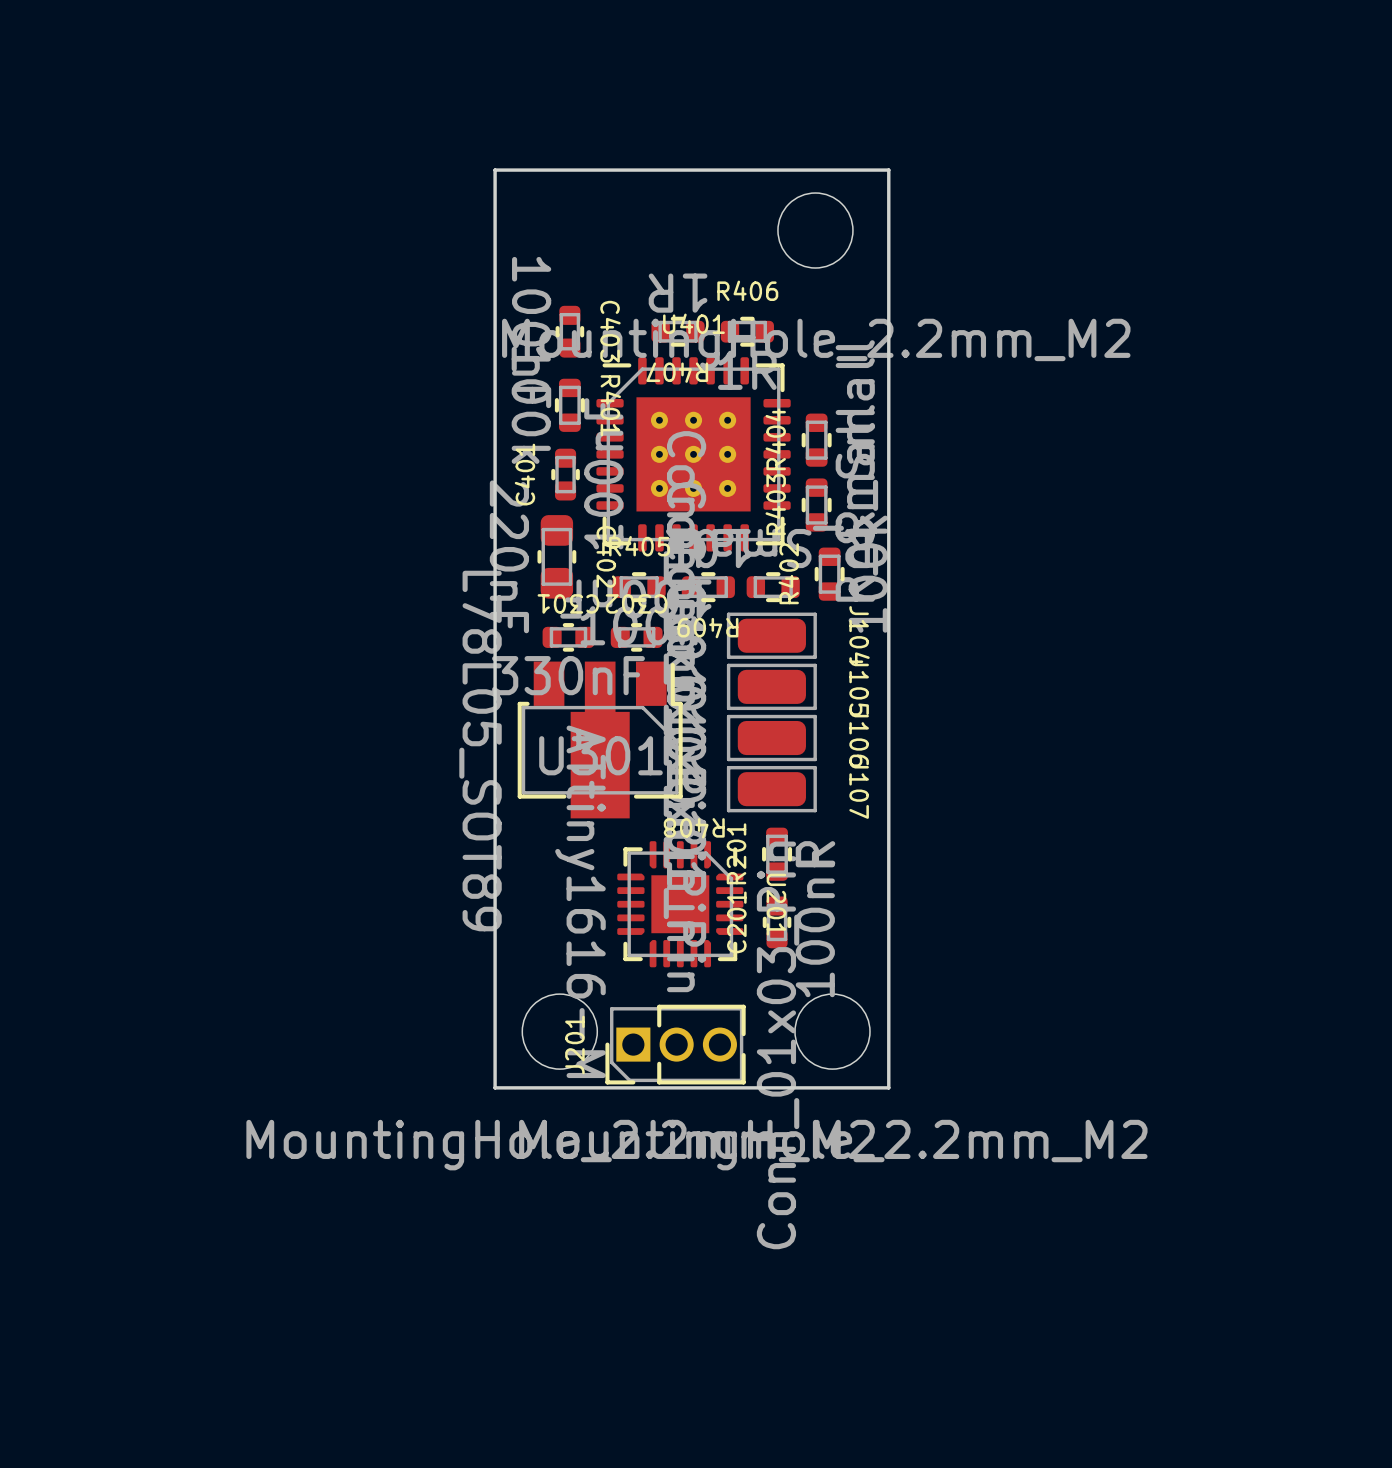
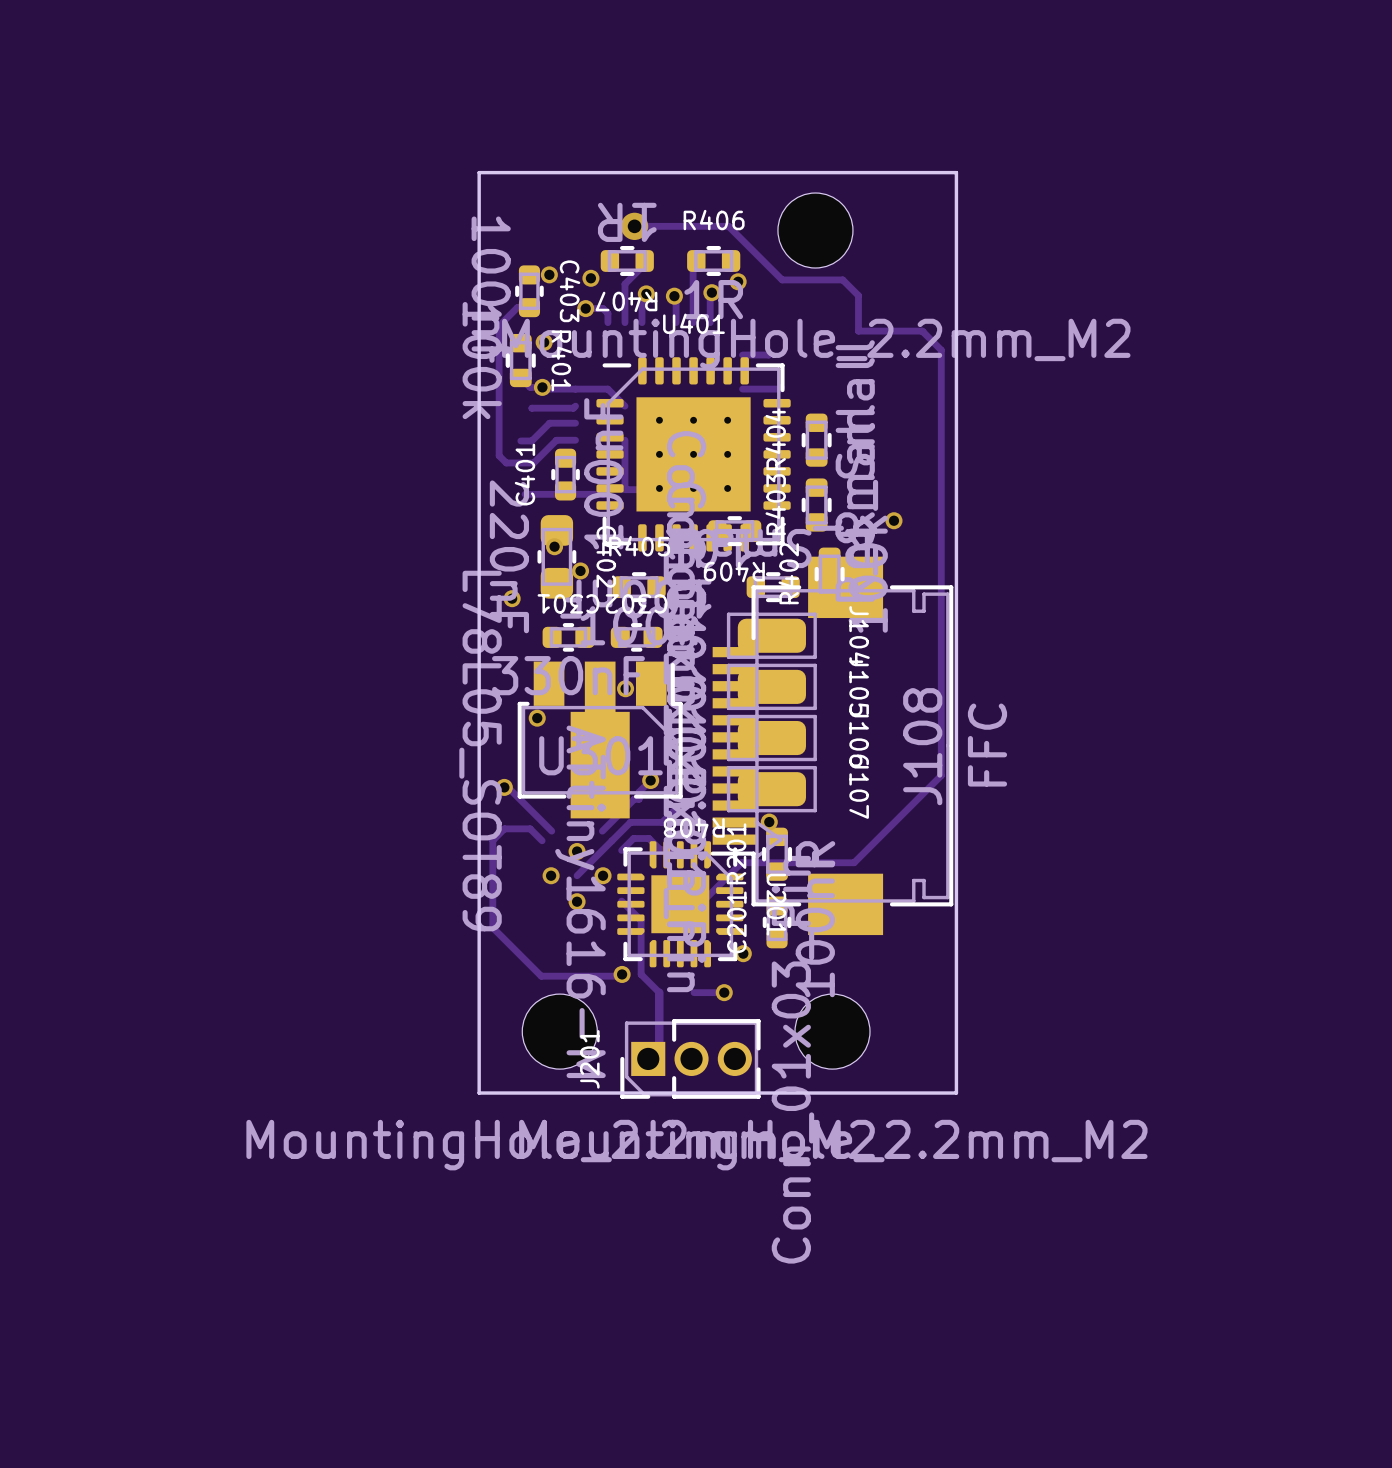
board edge: (495, 170) (888, 170) (888, 1087) (495, 1087) (495, 170) -> (479, 172) (479, 1093) (956, 1093) (956, 172) (479, 172)
track: none -> (634, 226) (728, 226) (782, 279) (842, 279) (858, 295) (858, 331) (922, 331) (941, 350) (941, 775) (854, 862) (741, 862) (685, 919)
via: none -> (634, 226)
track: none -> (644, 260) (644, 264) (624, 284) (624, 322)
track: none -> (696, 260) (693, 264) (693, 322)
via: none -> (549, 274)
via: none -> (590, 278)
via: none -> (738, 281)
track: none -> (711, 292) (710, 322)
via: none -> (711, 292)
track: none -> (646, 293) (642, 298) (642, 322)
via: none -> (646, 293)
track: none -> (674, 296) (676, 297) (676, 322)
via: none -> (674, 296)
track: none -> (529, 307) (517, 307) (499, 325) (499, 455) (506, 462) (533, 462) (556, 440) (575, 440)
track: none -> (585, 308) (603, 308) (607, 313) (607, 322)
via: none -> (585, 308)
C403 position: (569, 331) -> (529, 291)
R407 position: (678, 331) -> (627, 260)
R406 position: (747, 331) -> (713, 260)
via: none -> (544, 342)
track: none -> (769, 354) (742, 355)
track: none -> (520, 377) (530, 387) (607, 389) (624, 406)
via: none -> (542, 387)
track: none -> (781, 387) (779, 389) (742, 389)
R401 position: (569, 405) -> (520, 360)
track: none -> (575, 406) (573, 408) (531, 408)
track: none -> (575, 423) (549, 423) (531, 440) (520, 440)
track: none -> (624, 440) (624, 489) (659, 489)
track: none -> (607, 489) (603, 494) (525, 494)
via: none -> (893, 520)
via: none -> (554, 546)
via: none -> (580, 570)
R409 position: (708, 587) -> (734, 531)
via: none -> (512, 598)
via: none -> (625, 688)
via: none -> (537, 718)
J108: none -> FFC (831, 745)
track: none -> (650, 780) (639, 792) (639, 799) (634, 799) (602, 831)
via: none -> (650, 780)
track: none -> (504, 787) (508, 787) (551, 831)
via: none -> (504, 787)
track: none -> (675, 806) (675, 808) (662, 822) (630, 822) (577, 875)
via: none -> (769, 822)
track: none -> (542, 840) (530, 828) (504, 828) (492, 840) (492, 927) (541, 976) (620, 976) (622, 974)
track: none -> (679, 849) (660, 849) (648, 838) (633, 838) (621, 850)
via: none -> (577, 851)
via: none -> (551, 875)
via: none -> (603, 875)
via: none -> (577, 901)
track: none -> (621, 901) (641, 920) (641, 974) (659, 992) (659, 1047) (648, 1058)
via: none -> (743, 953)
via: none -> (622, 974)
track: none -> (694, 992) (724, 992)
via: none -> (724, 992)
J201 position: (675, 1044) -> (690, 1058)

